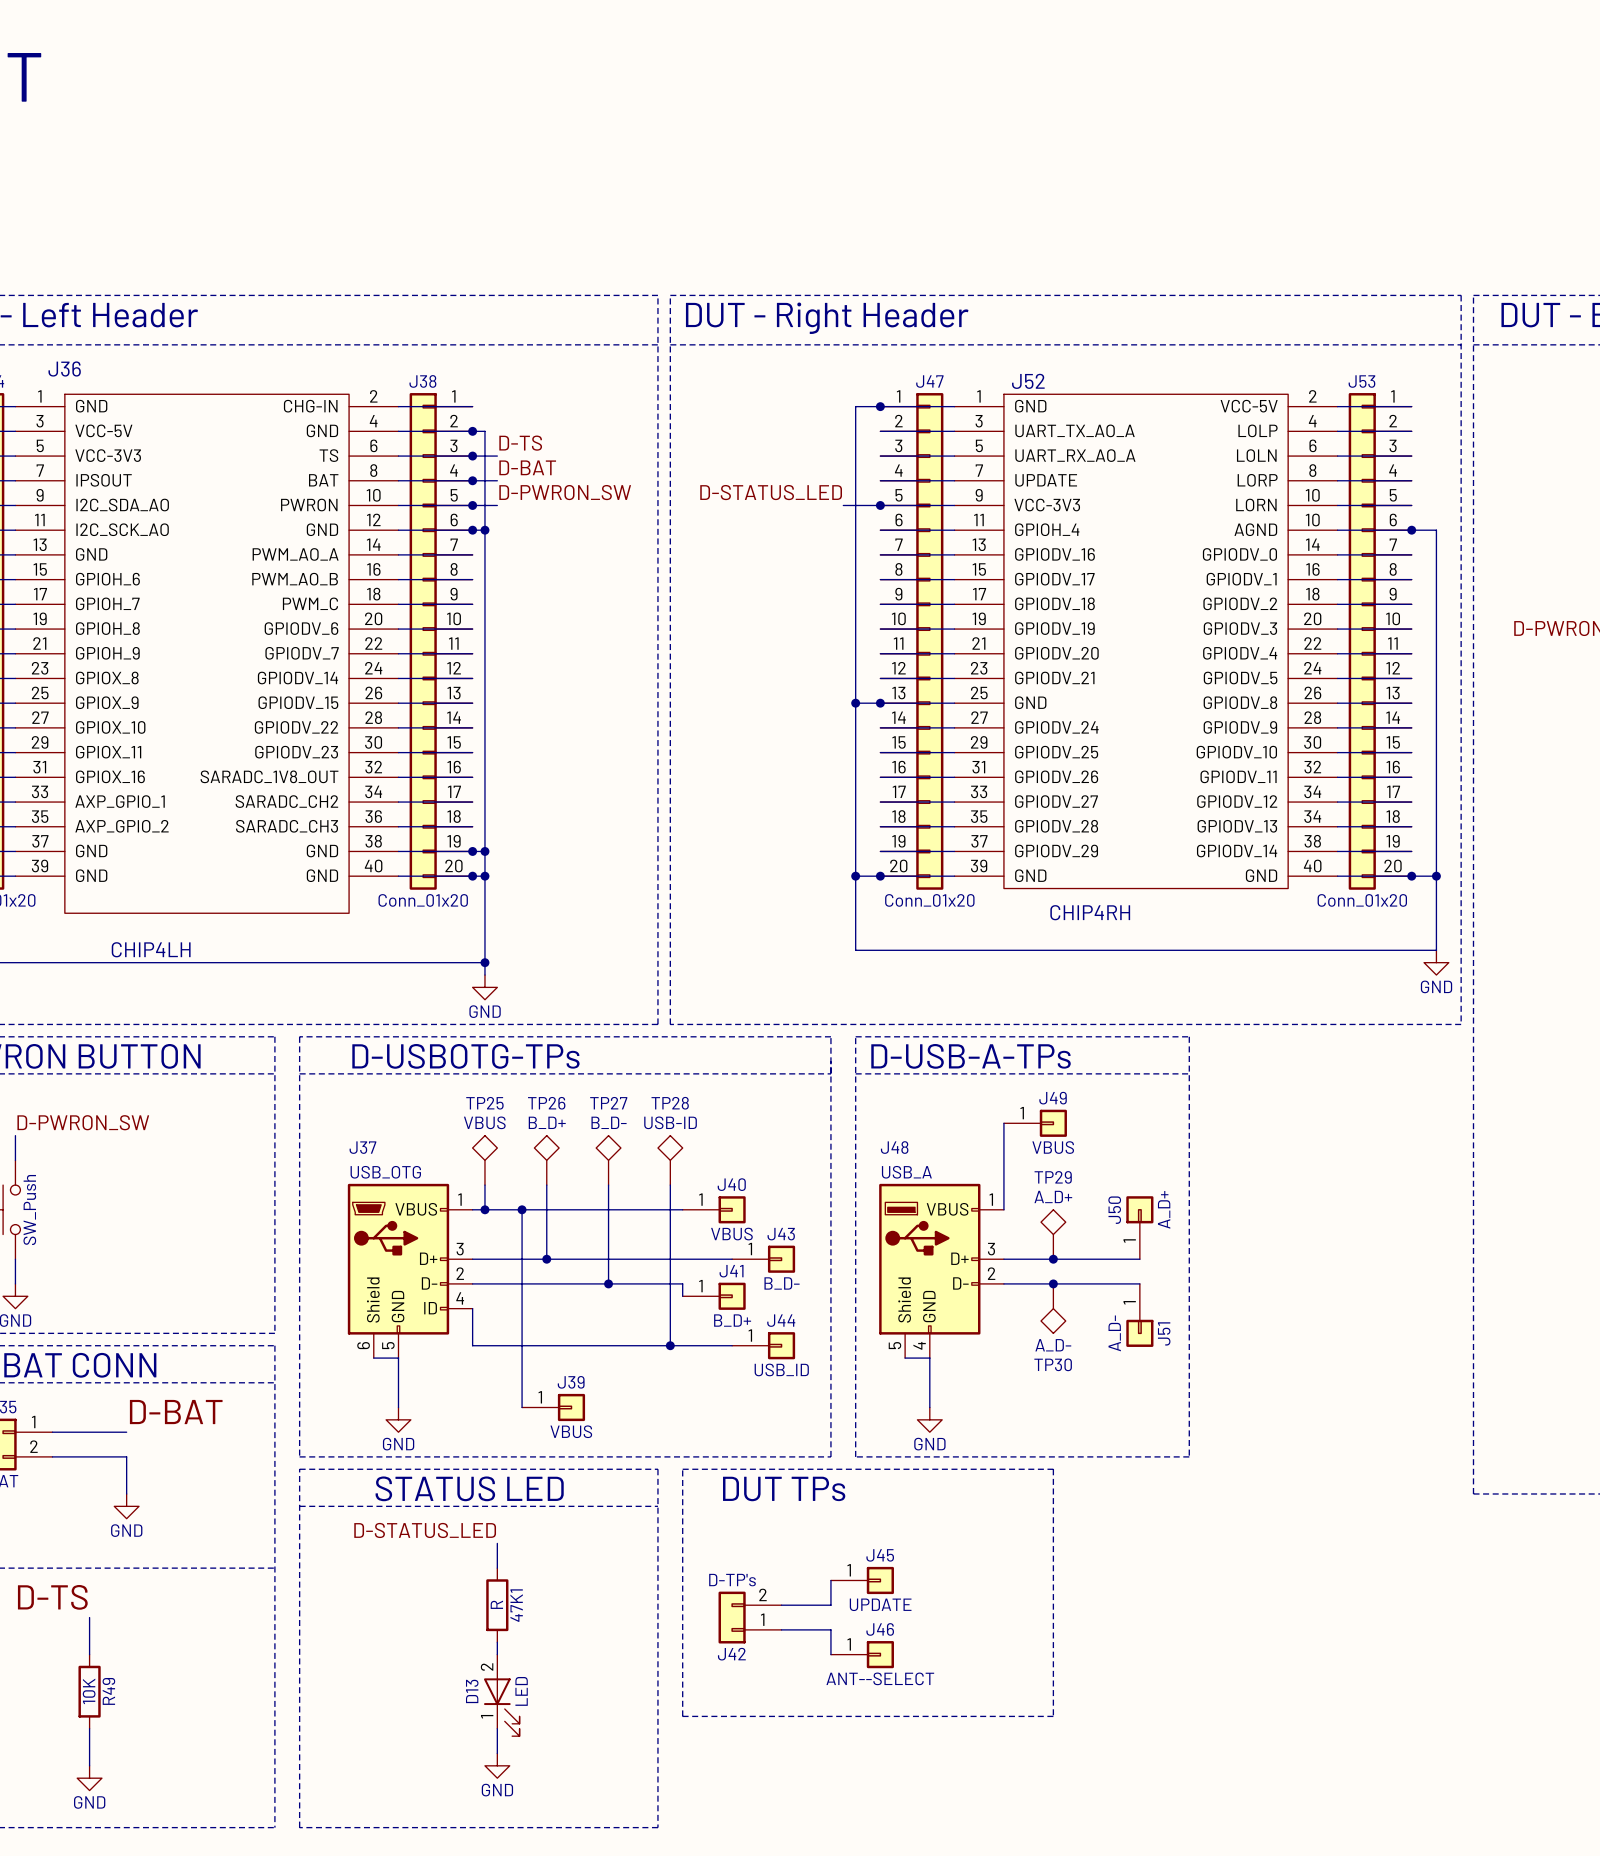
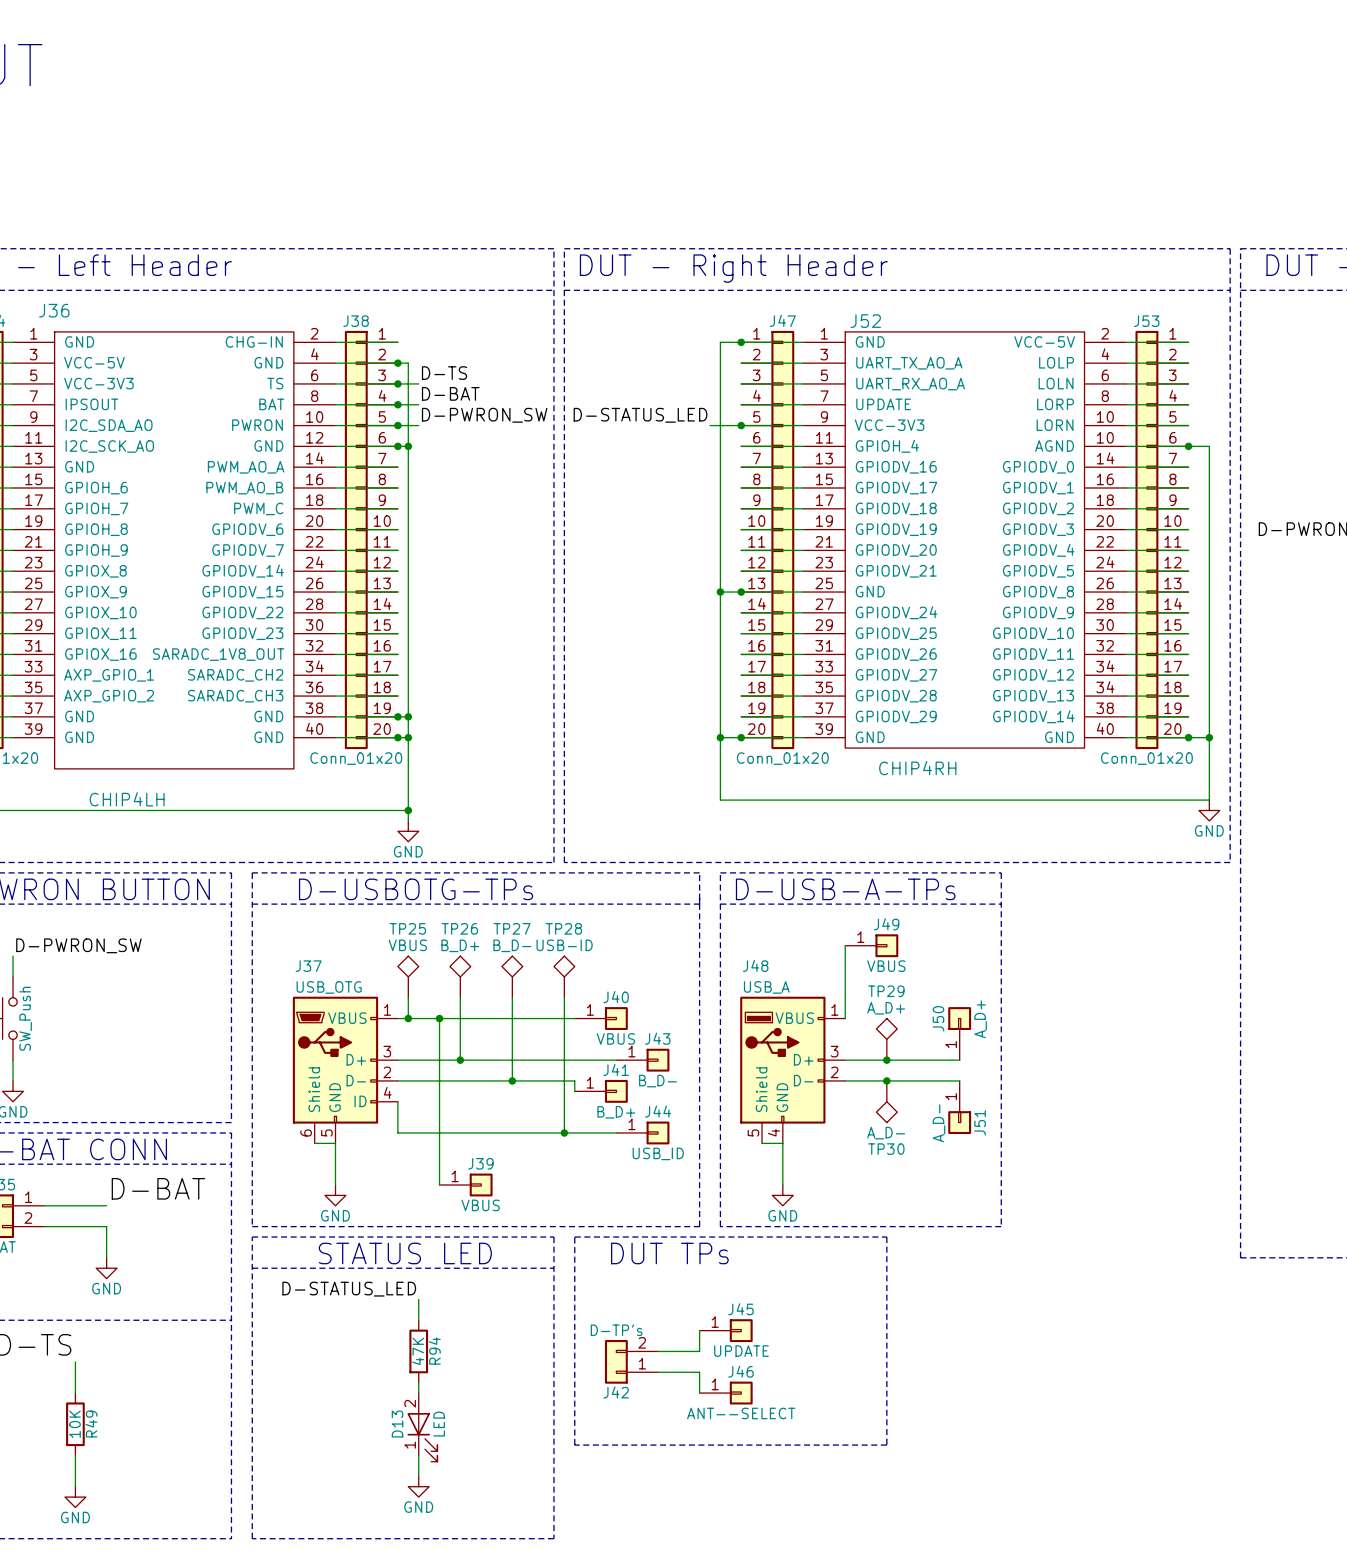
47K1 value: R (496, 1604) -> 47K (418, 1351)
47K1 name: 47K1 (516, 1605) -> R94 (434, 1350)

